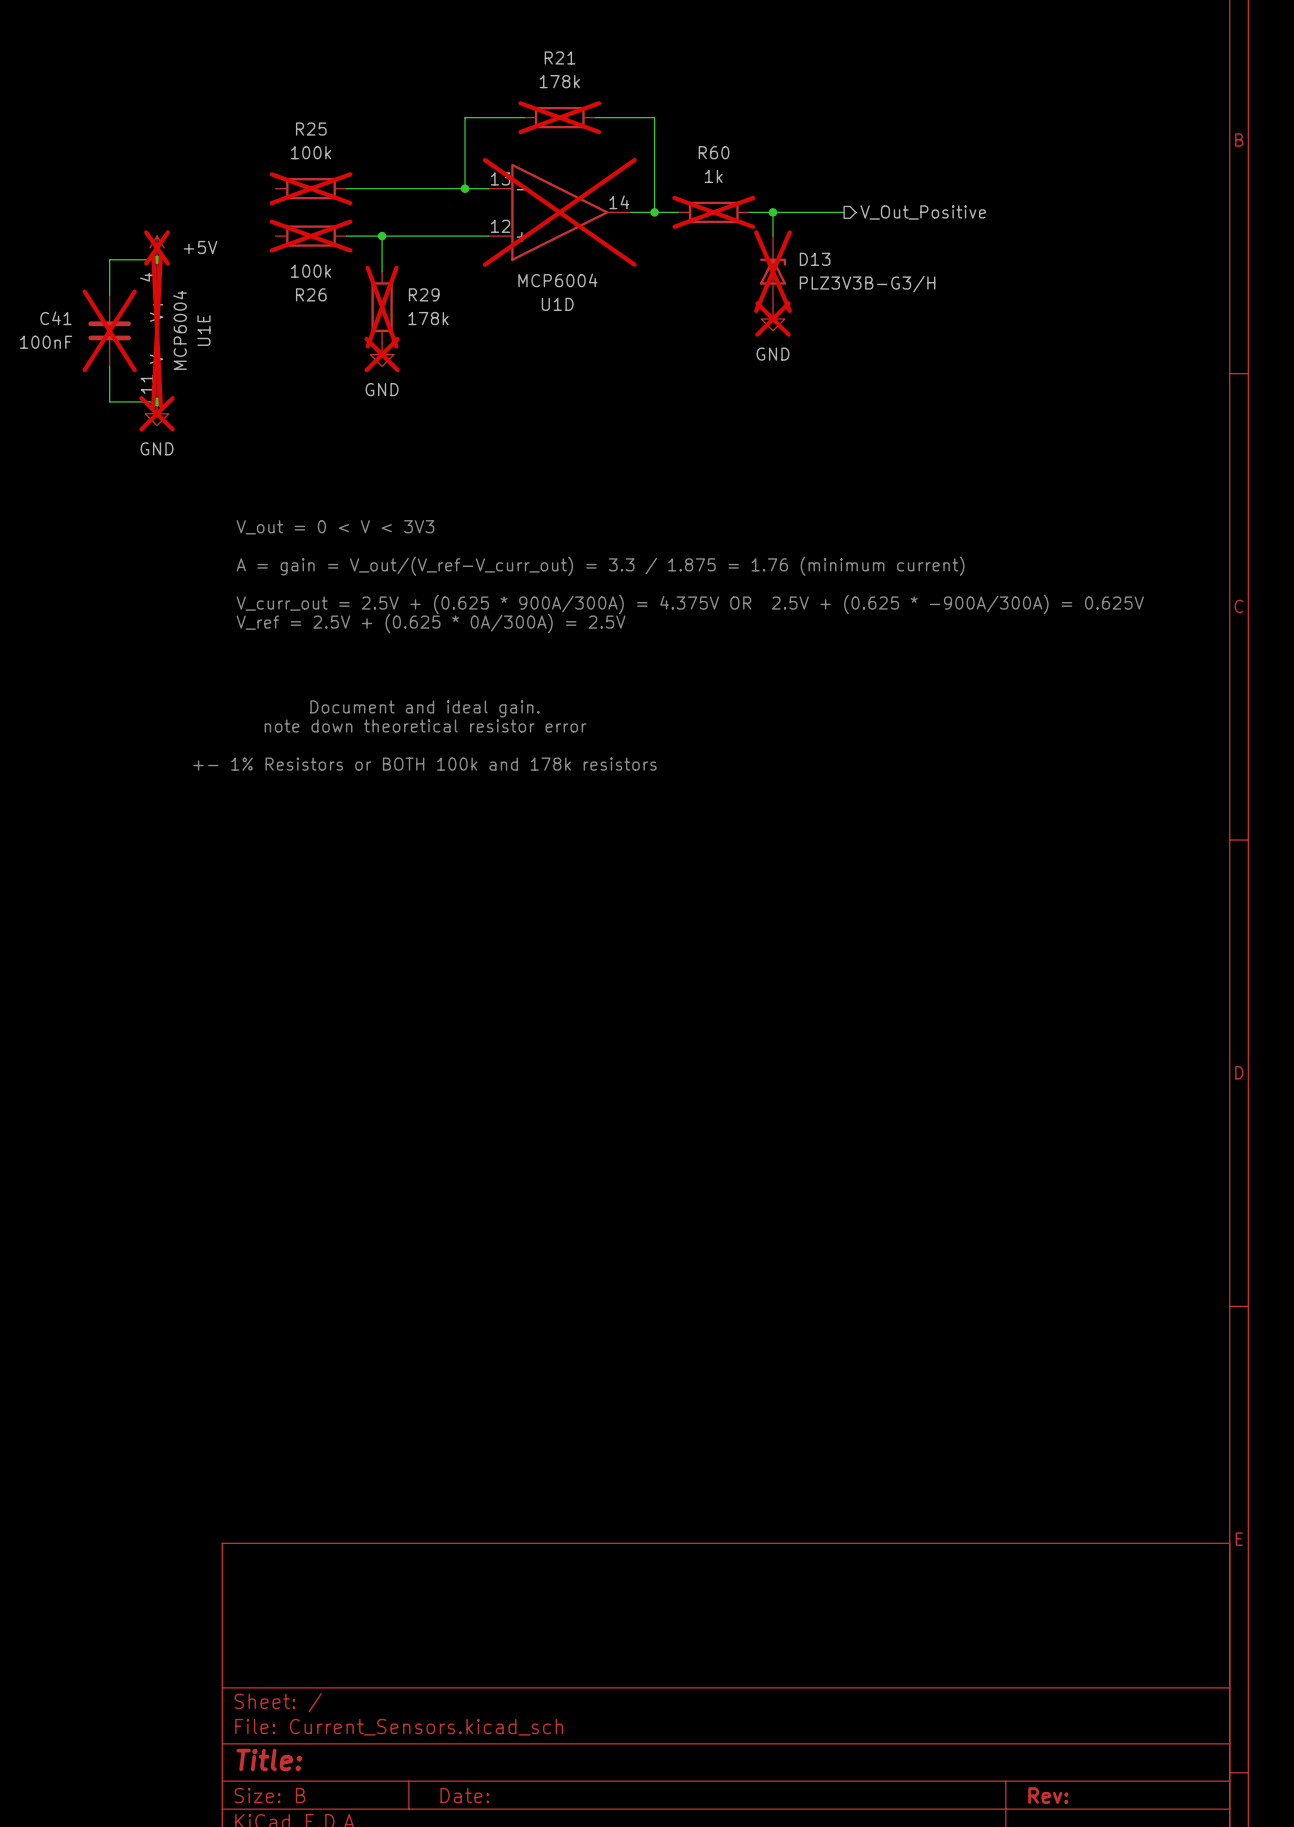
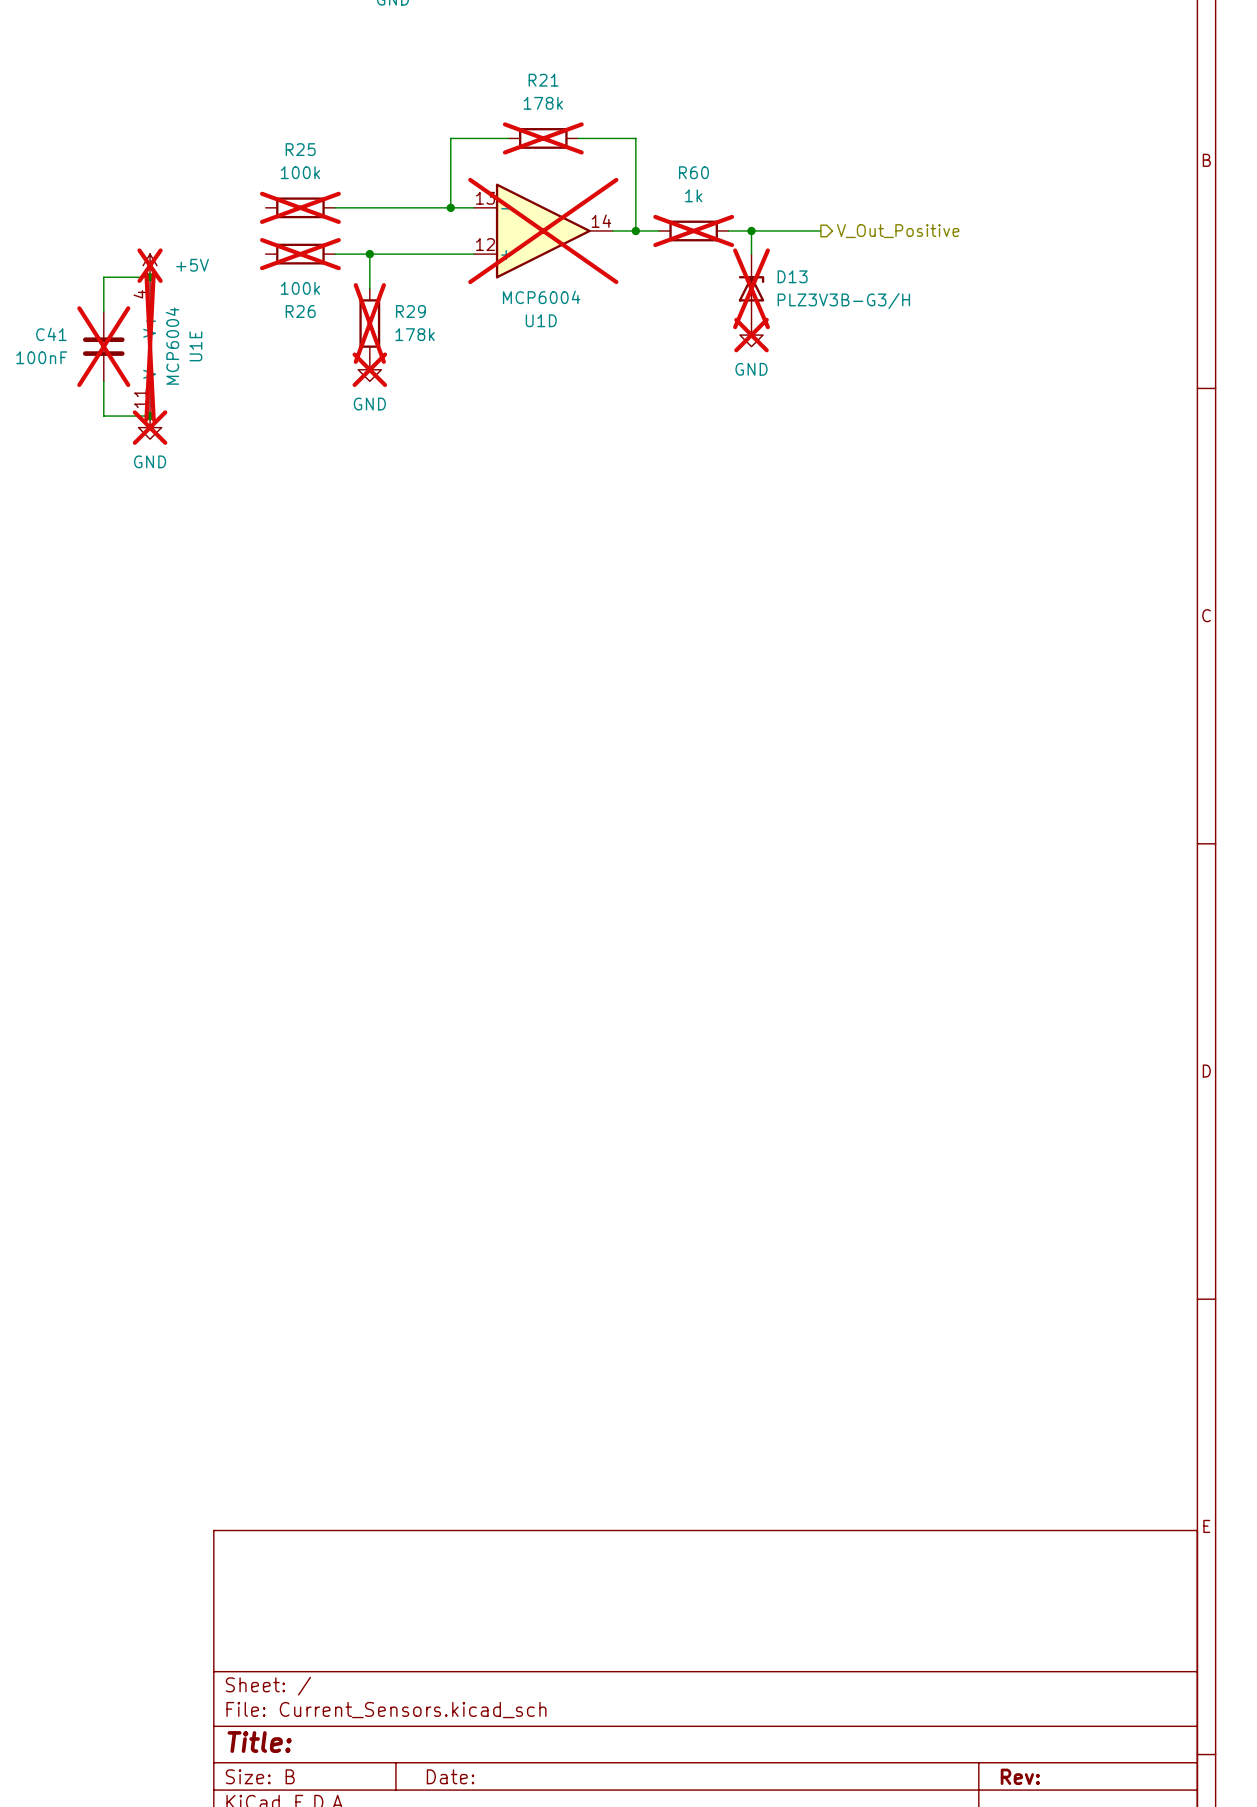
text: V_out = 0 < V < 3V3 (335, 527) -> none
text: A = gain = V_out/(V_ref-V_curr_out) = 3.3 / 1.875 = 1.76 (minimum current) (600, 566) -> none
text: V_curr_out = 2.5V + (0.625 * 900A/300A) = 4.375V OR 2.5V + (0.625 * -900A/300A) = 0.625V (690, 604) -> none
text: V_ref = 2.5V + (0.625 * 0A/300A) = 2.5V (431, 623) -> none
text: Document and ideal gain. (425, 708) -> none
text: note down theoretical resistor error (425, 725) -> none
text: +- 1% Resistors or BOTH 100k and 178k resistors (425, 764) -> none

